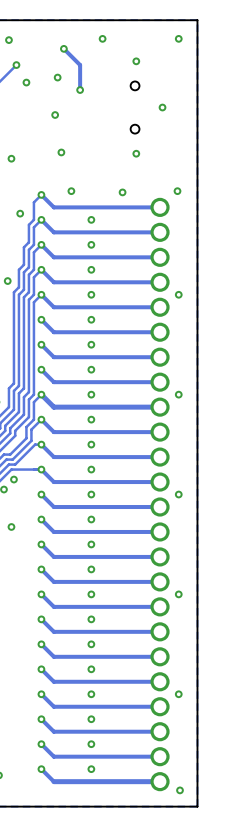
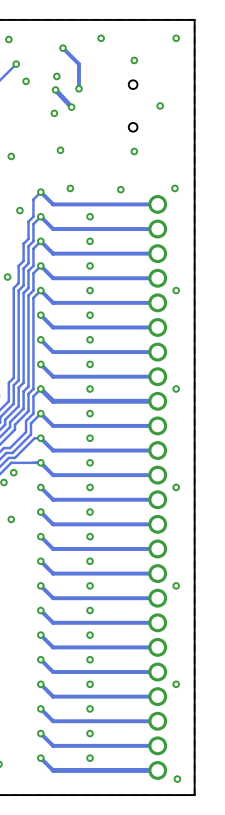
track: none -> (55, 89) (71, 107)
via: none -> (55, 89)
via: none -> (71, 107)

